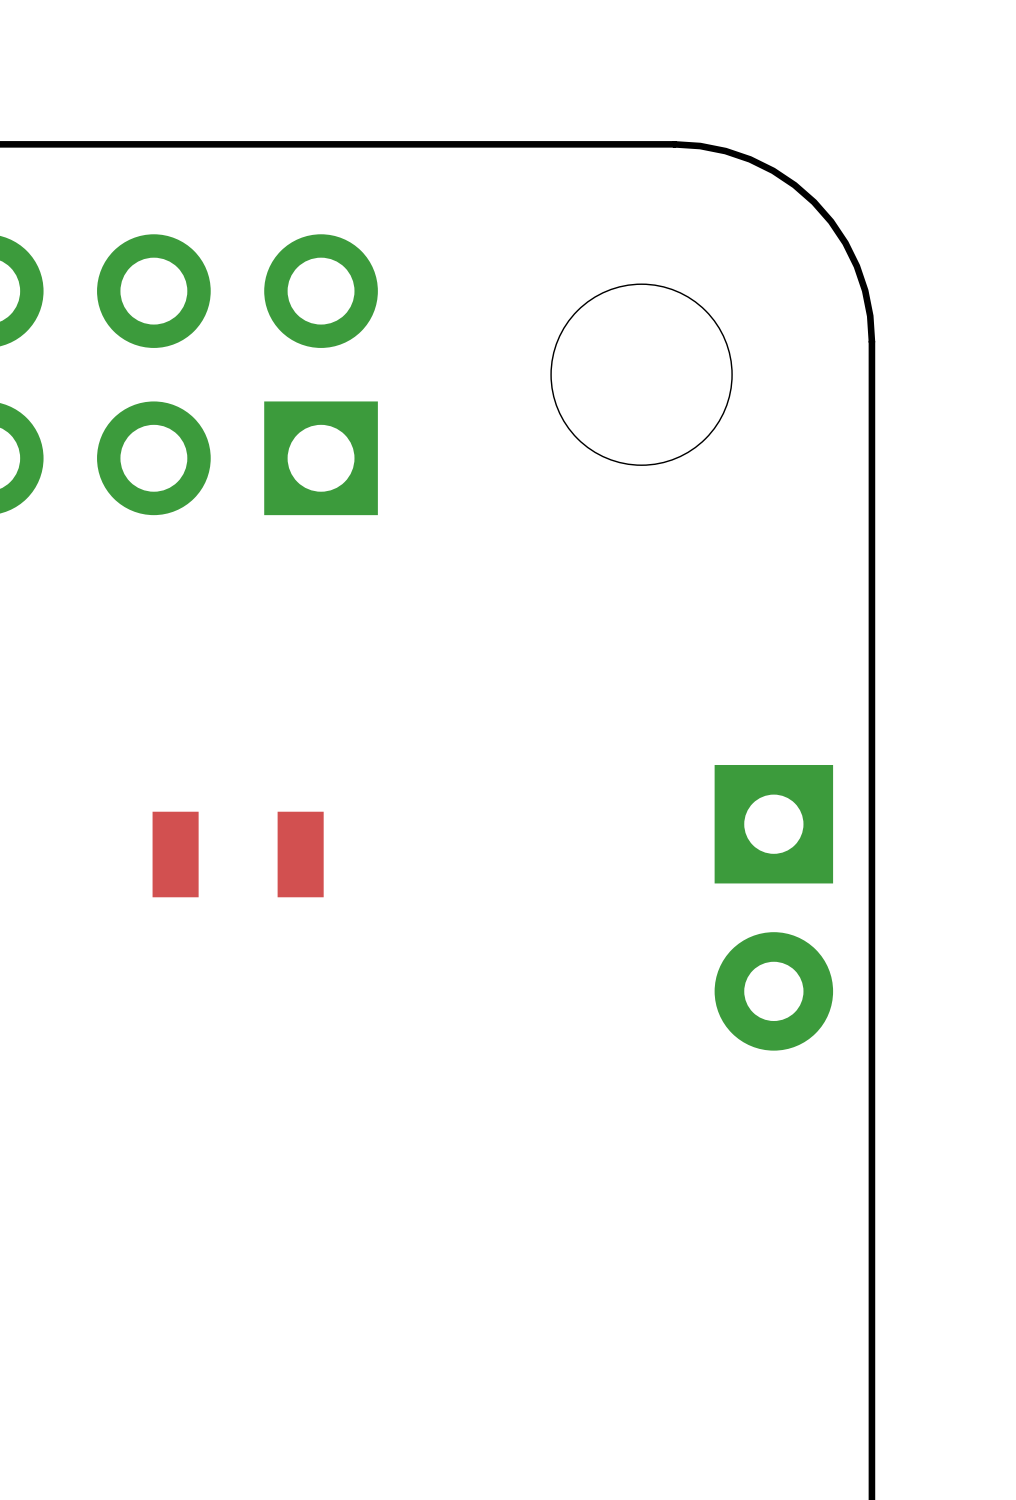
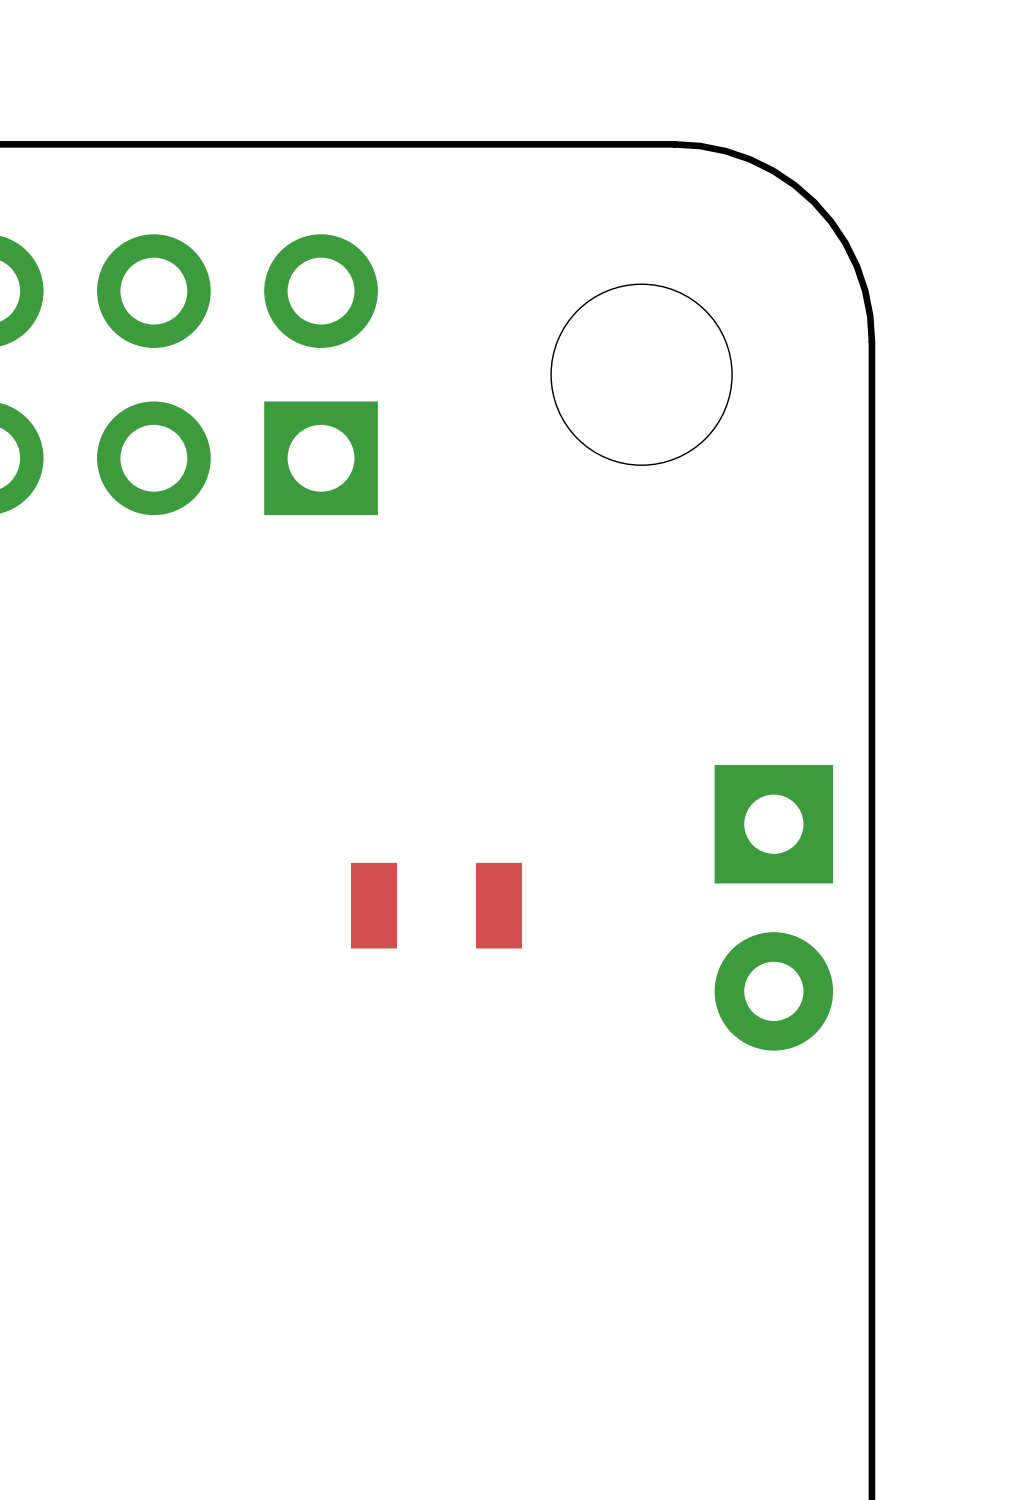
part position: (238, 854) -> (436, 905)

